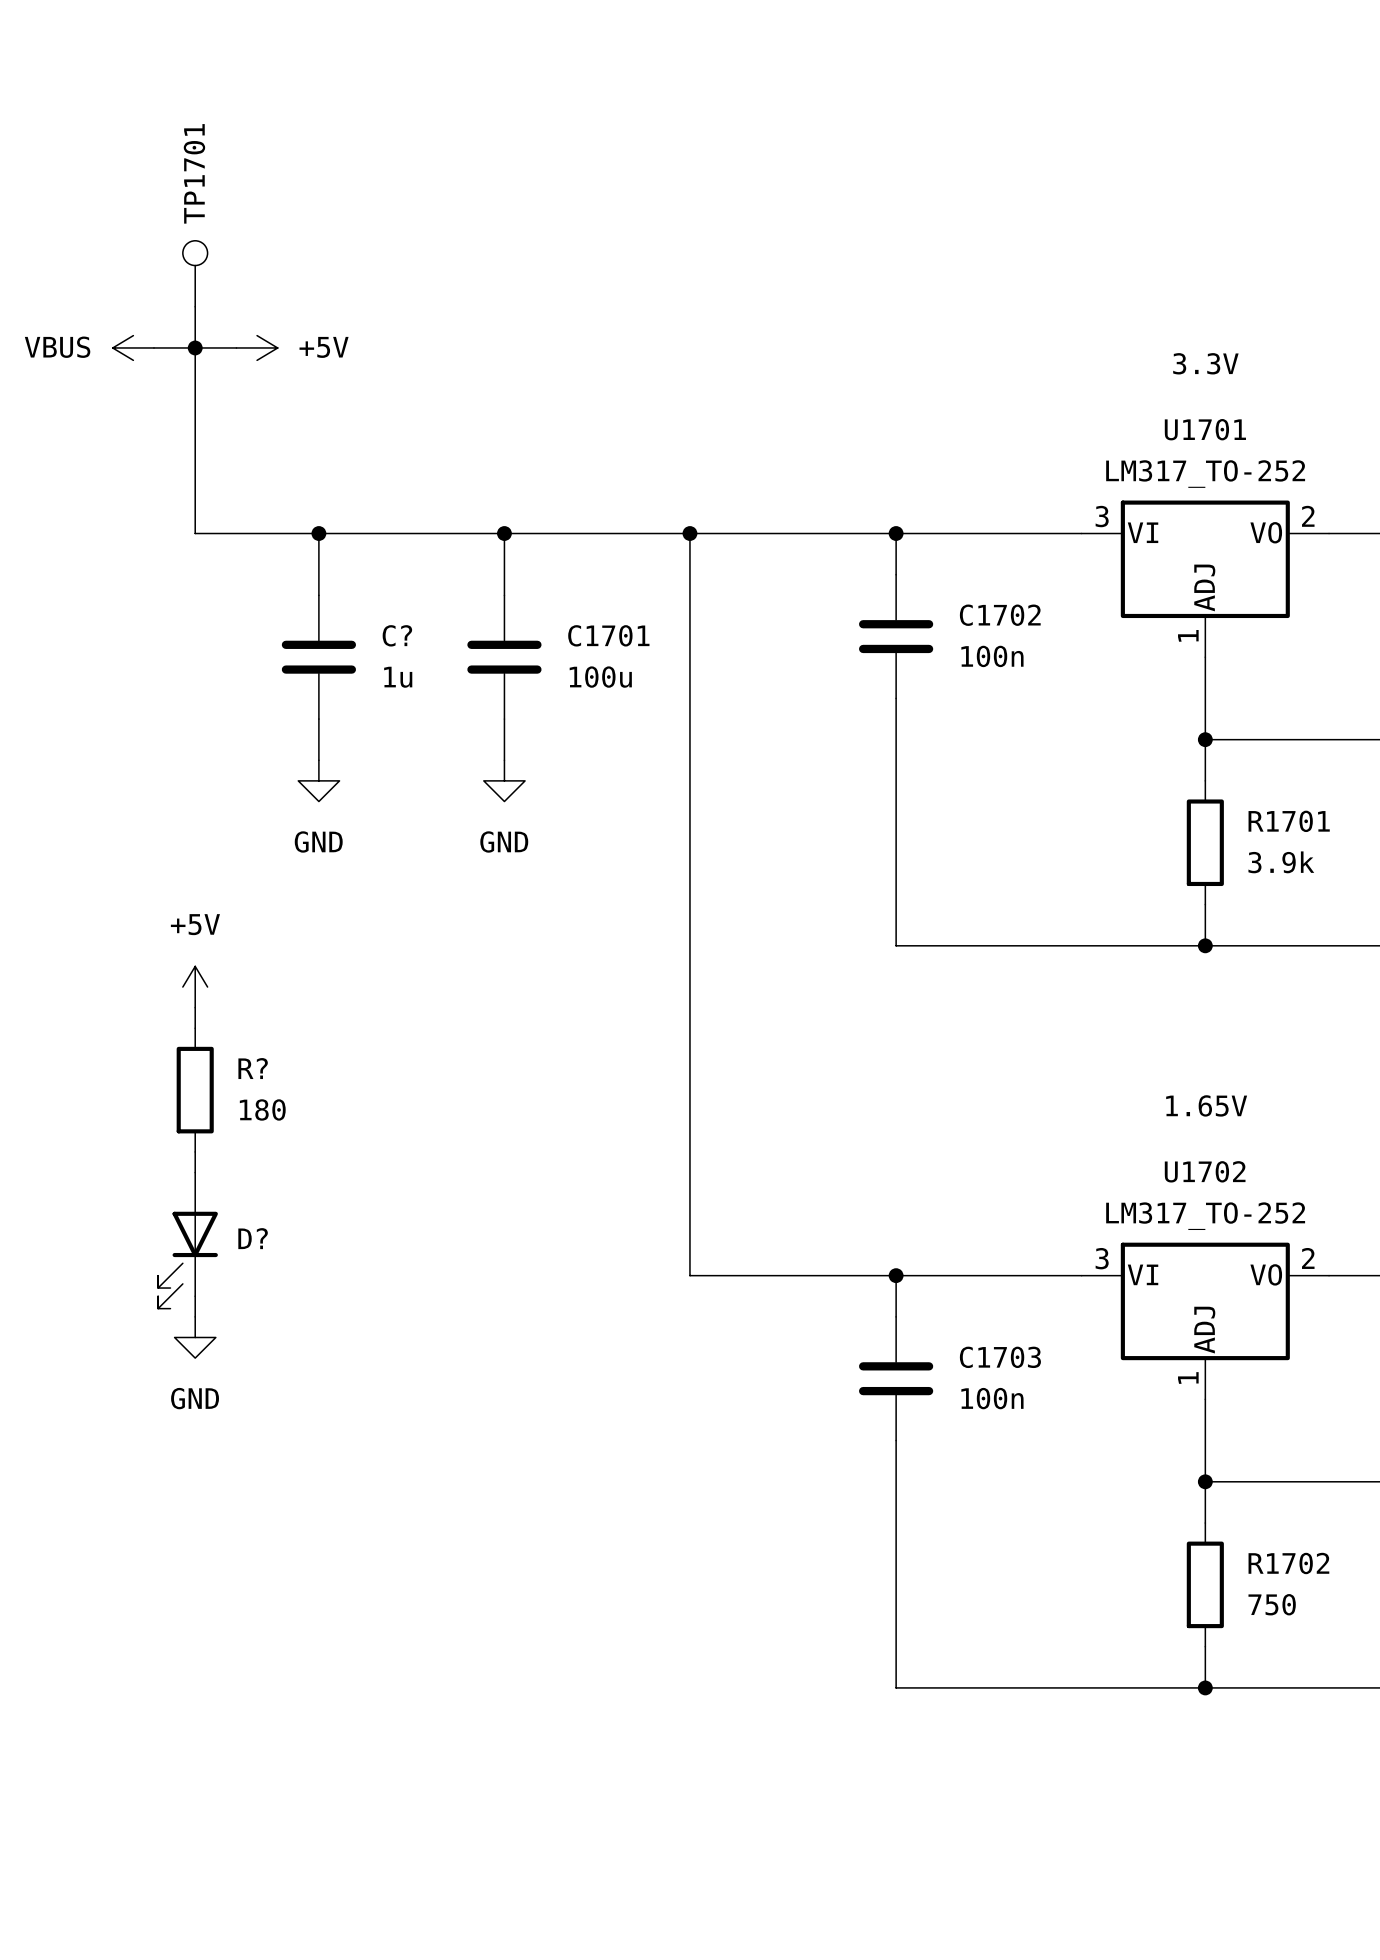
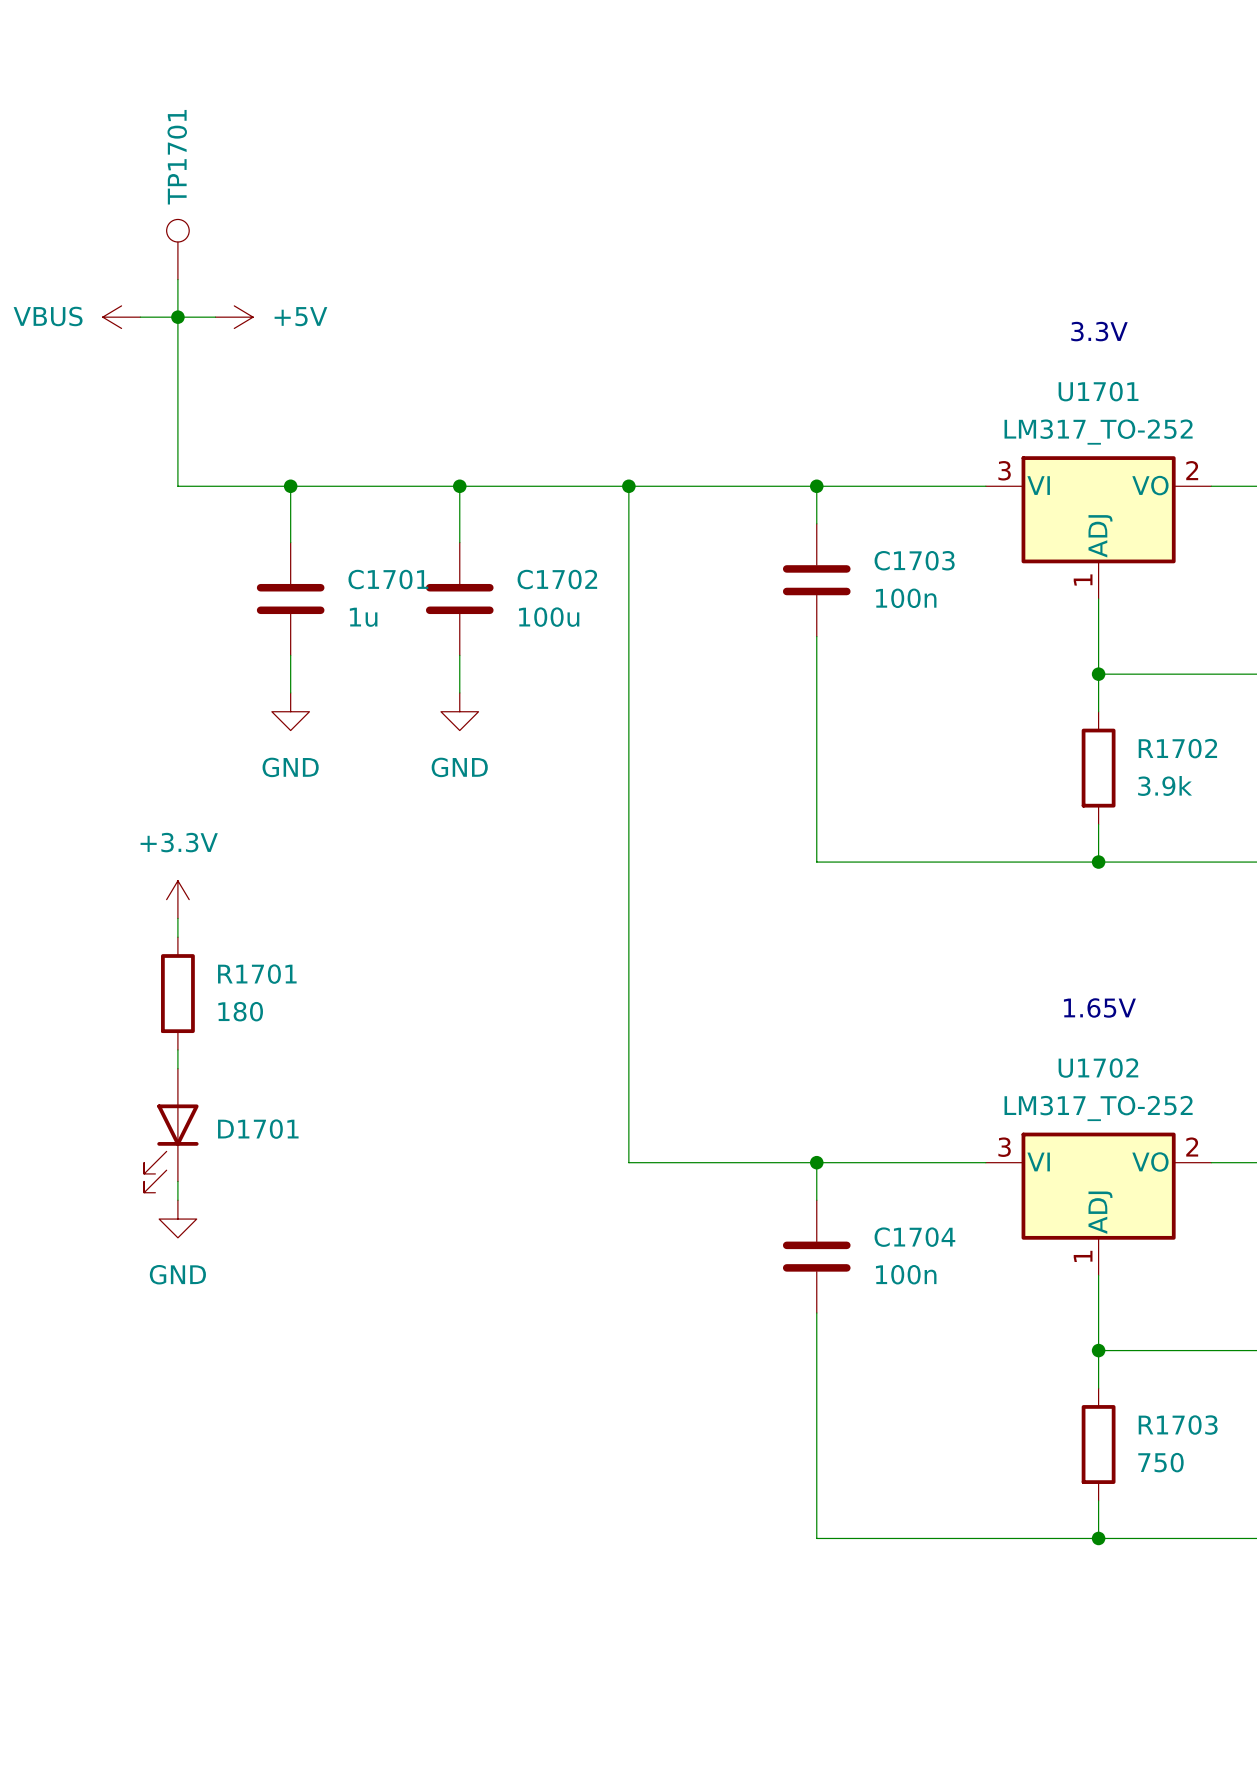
C1702 name: C1702 (1000, 615) -> C1703 (914, 560)
C? name: C? (397, 635) -> C1701 (388, 579)
C1701 name: C1701 (608, 635) -> C1702 (557, 579)
R1701 name: R1701 (1289, 821) -> R1702 (1177, 748)
power symbol: +5V (195, 987) -> +3.3V (177, 899)
R? name: R? (253, 1068) -> R1701 (257, 974)
D? name: D? (253, 1238) -> D1701 (258, 1129)
C1703 name: C1703 (1000, 1357) -> C1704 (914, 1237)
R1702 name: R1702 (1288, 1563) -> R1703 (1178, 1425)

